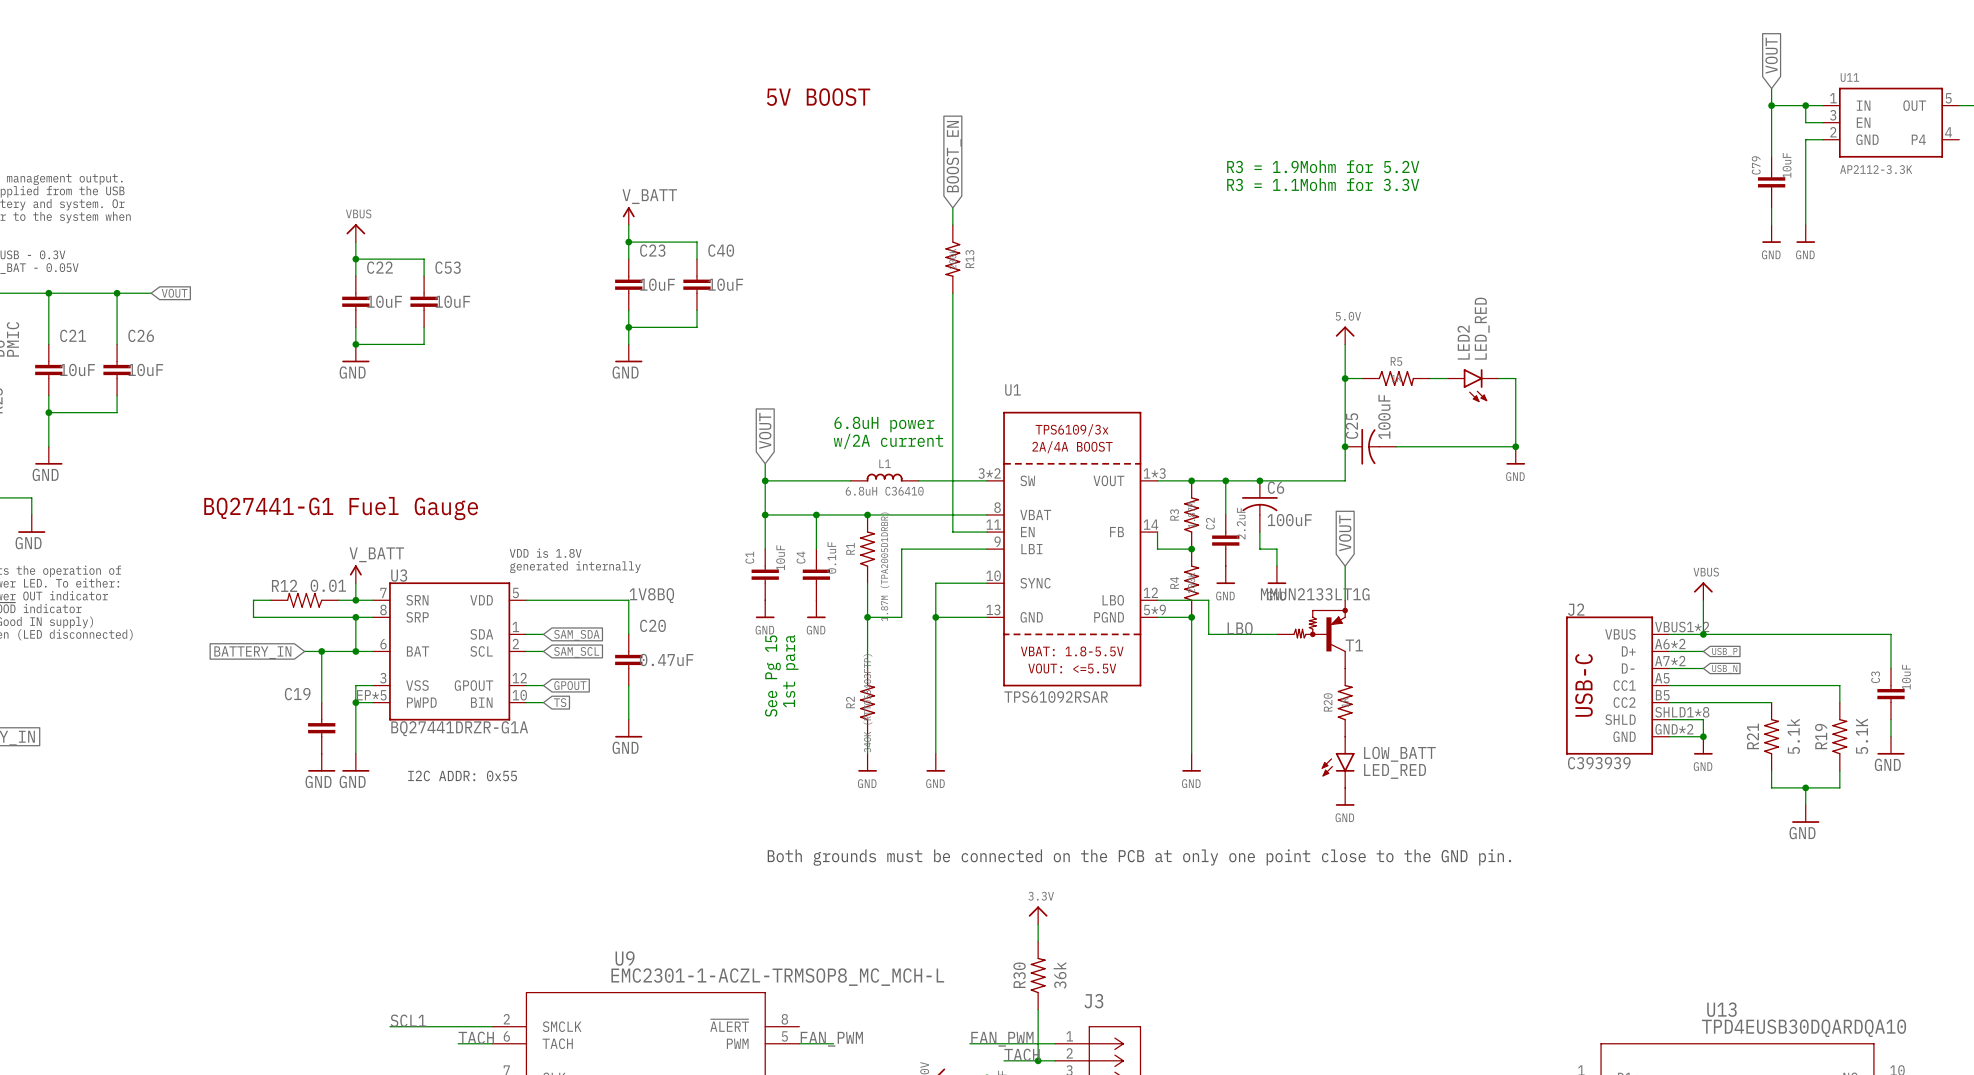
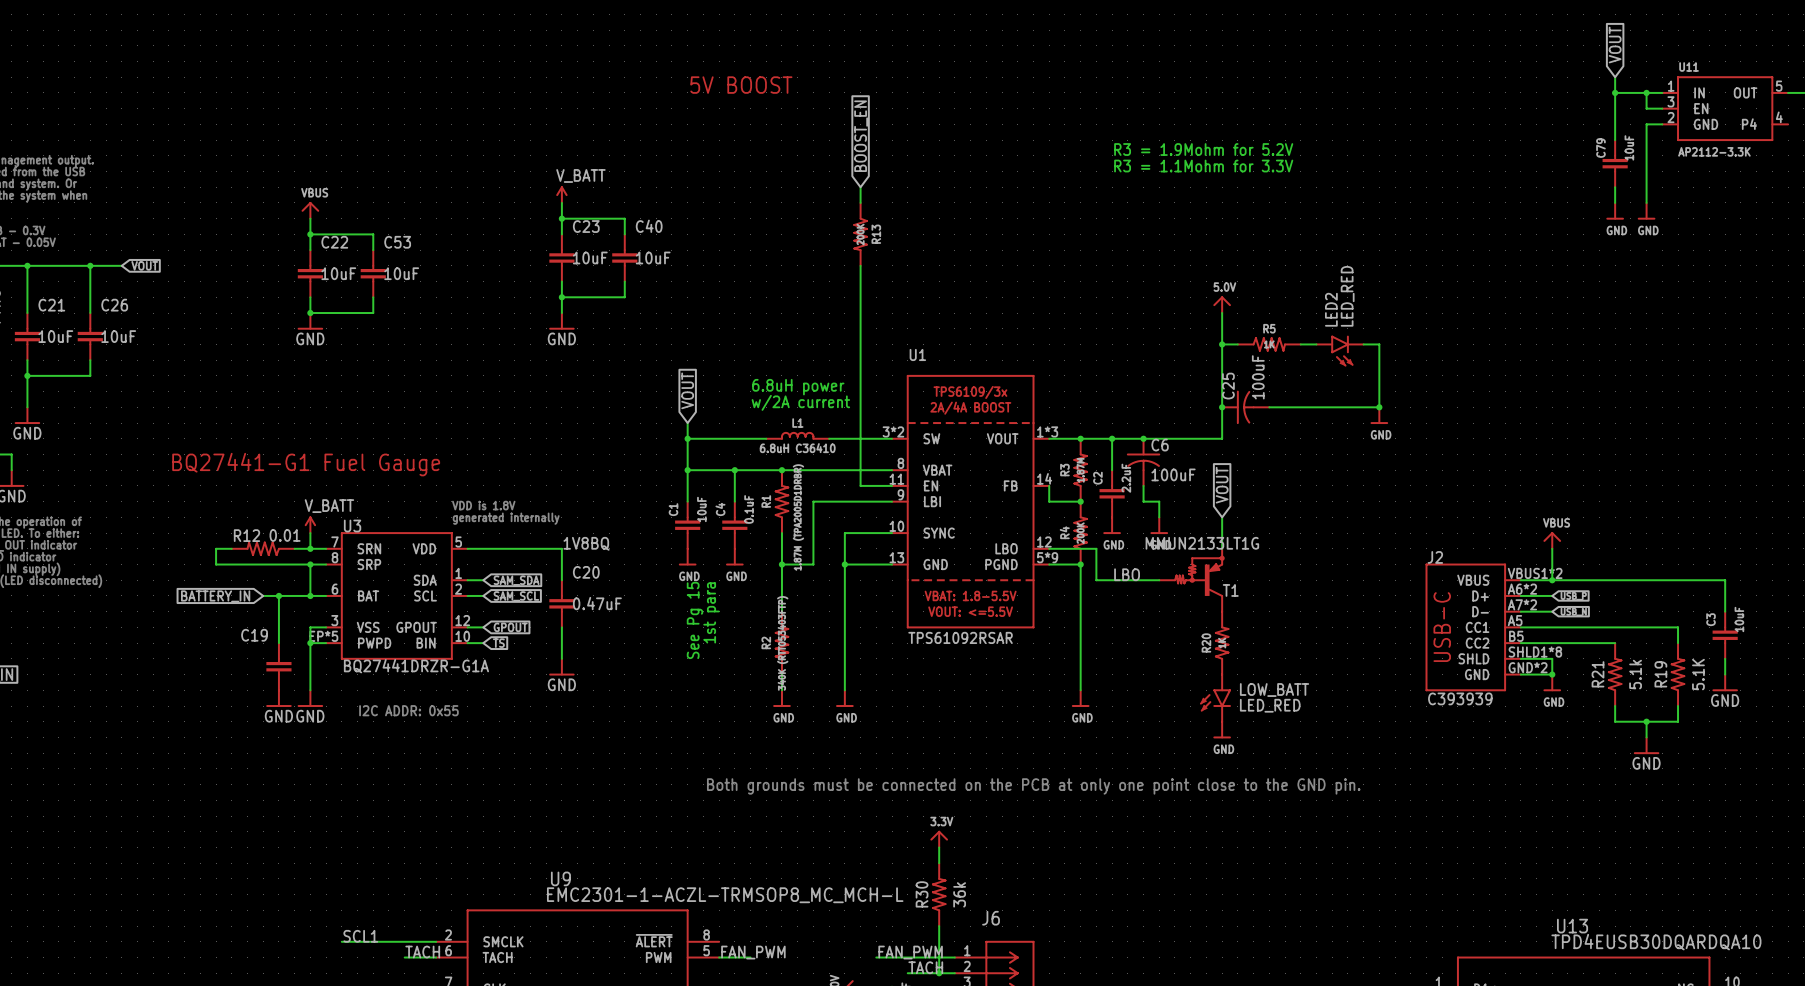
J3 name: J3 (1093, 1001) -> J6 (991, 918)

